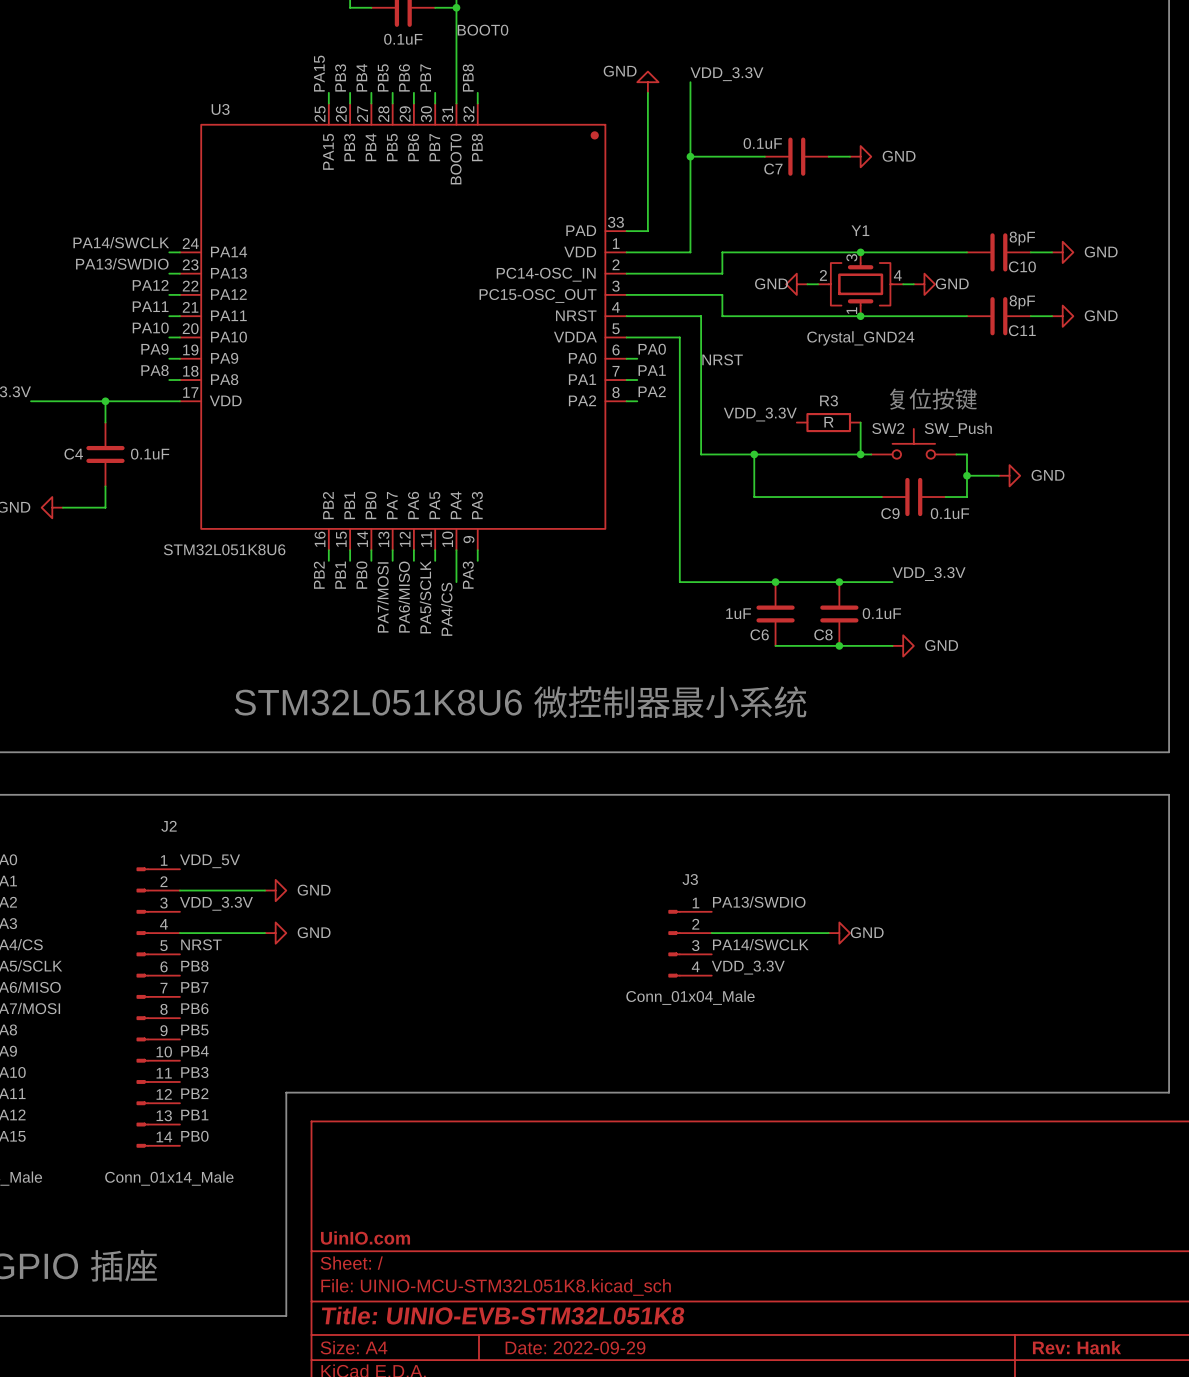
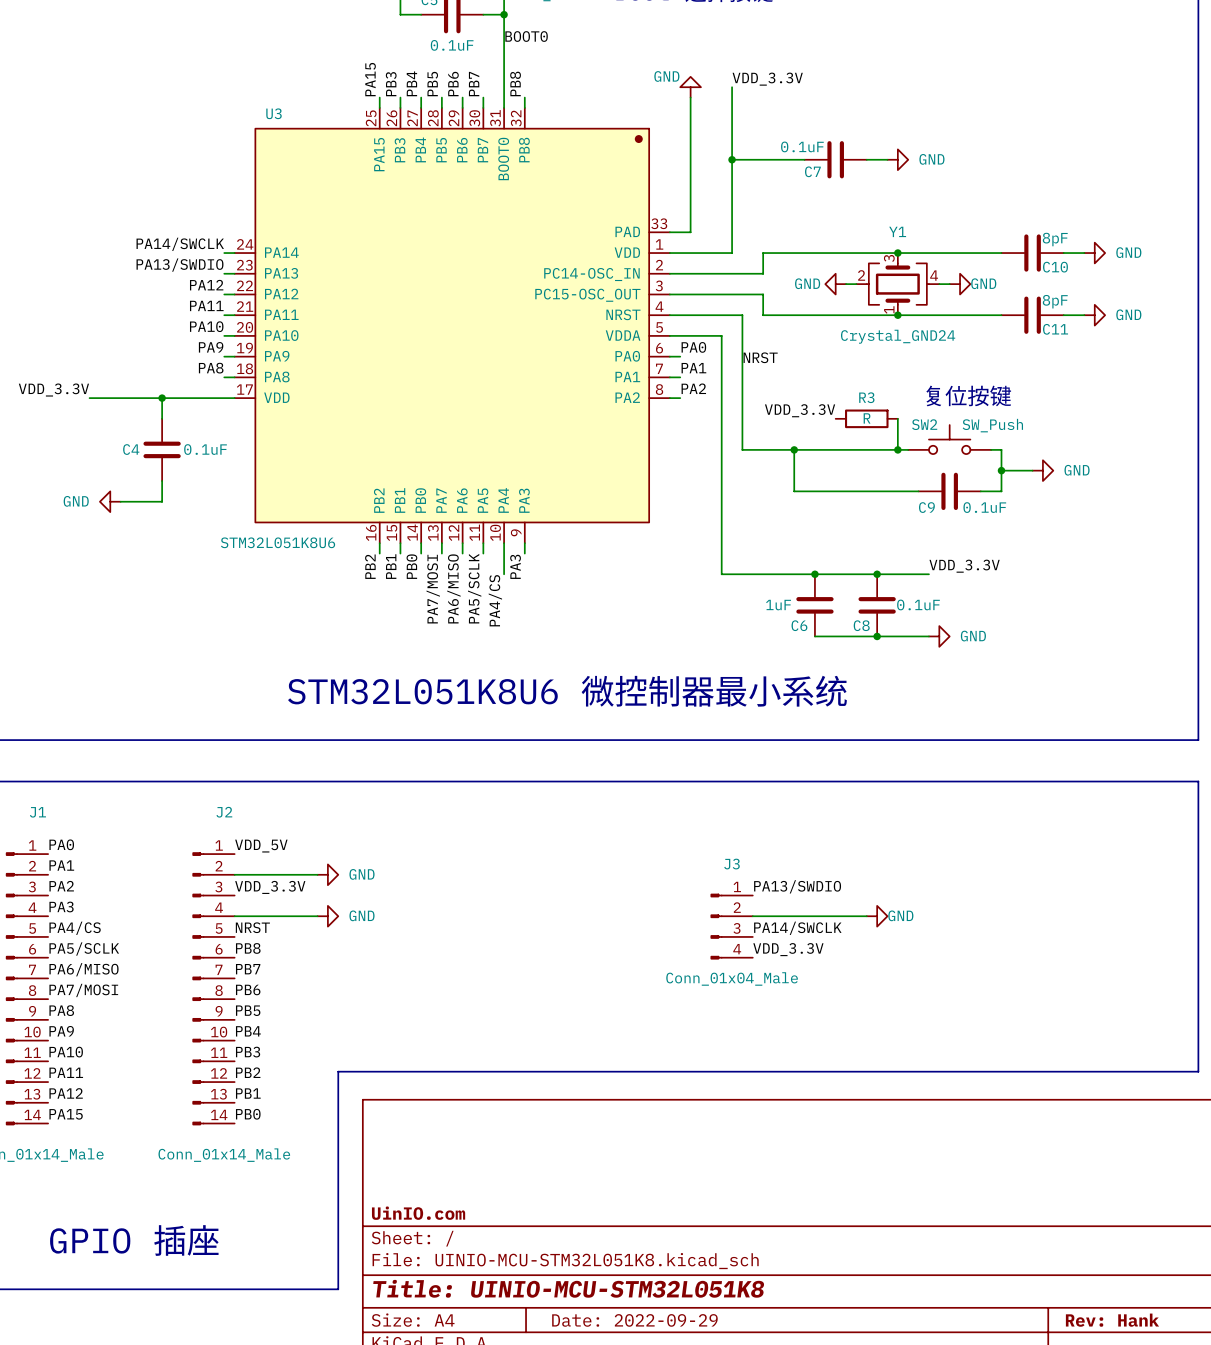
title block: Title: UINIO-EVB-STM32L051K8 (503, 1315) -> Title: UINIO-MCU-STM32L051K8 (568, 1288)

